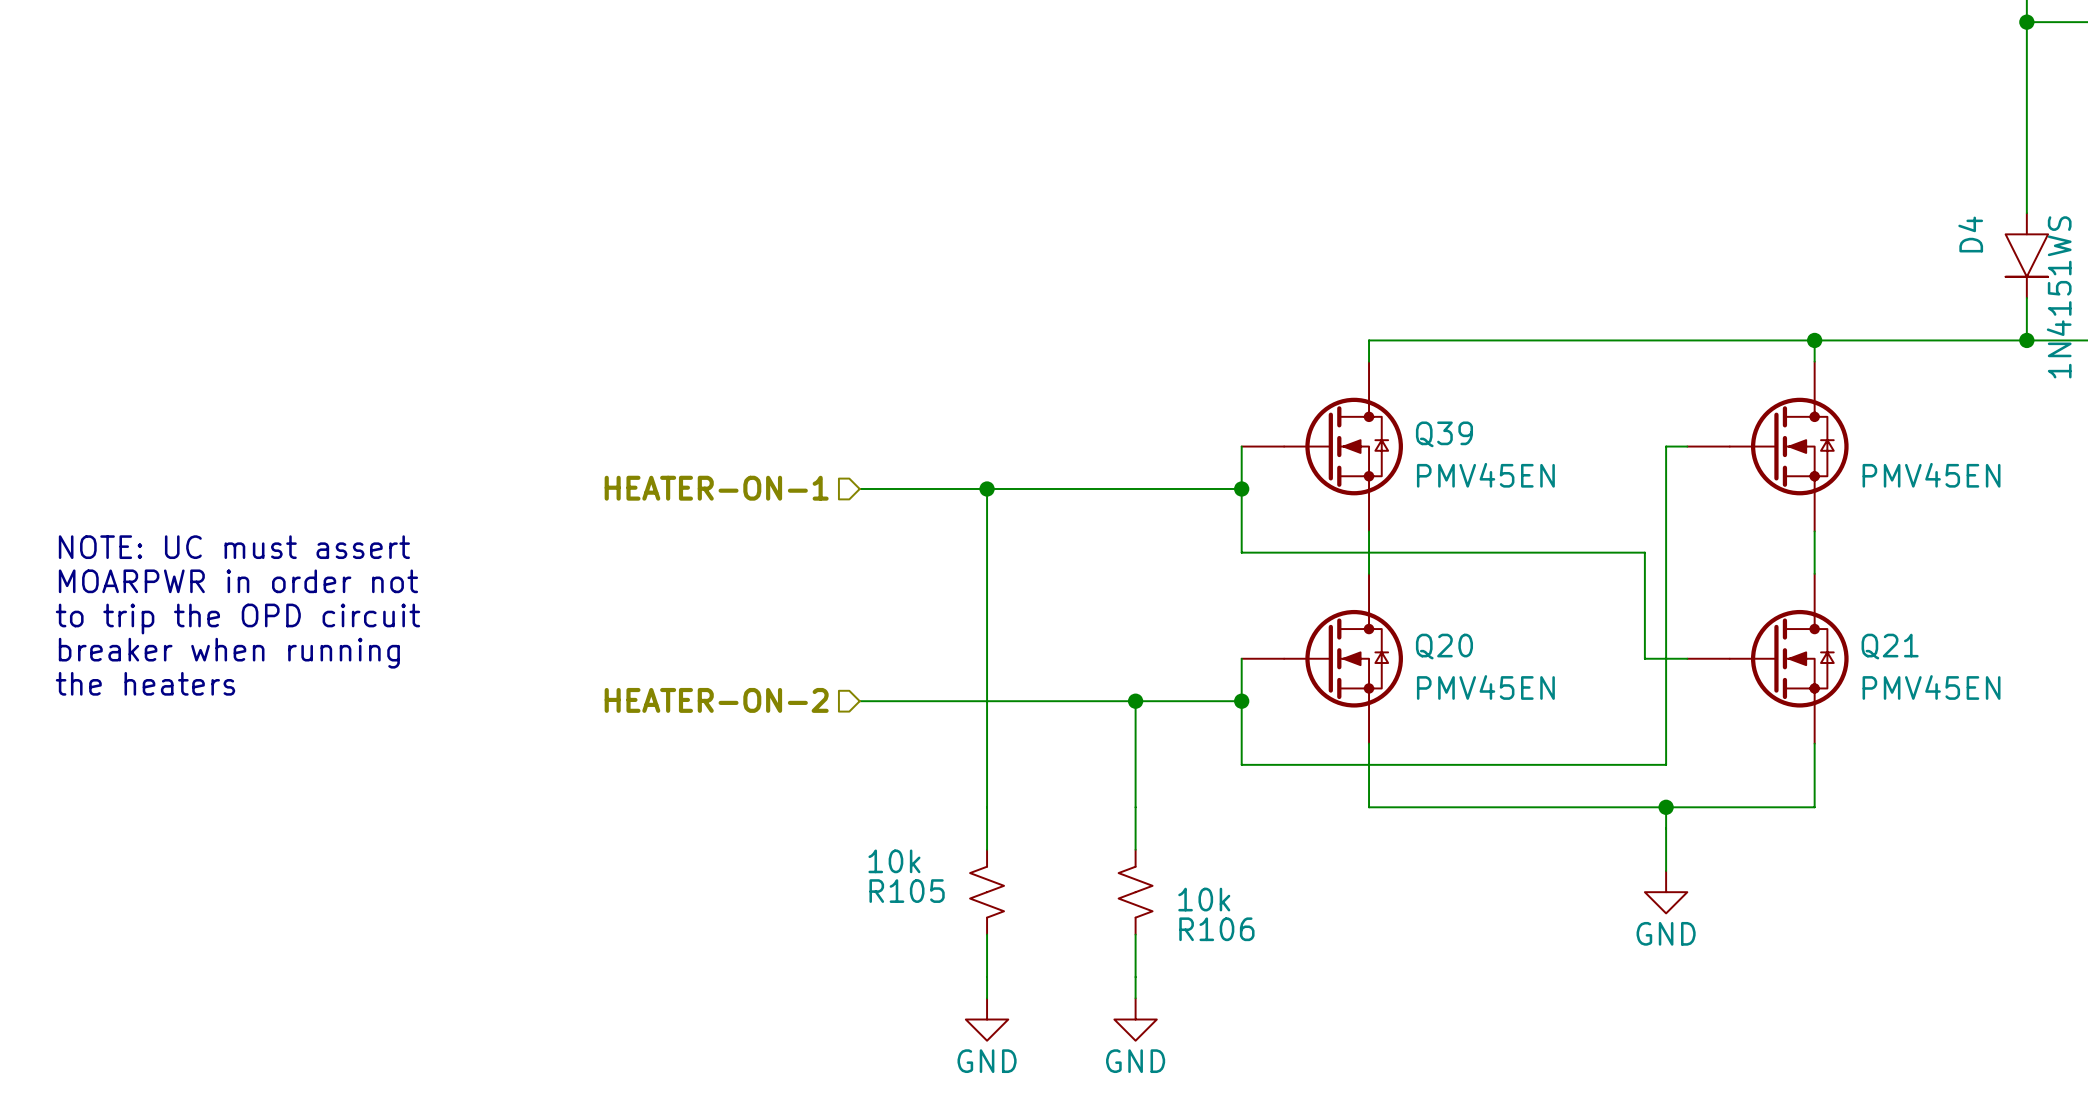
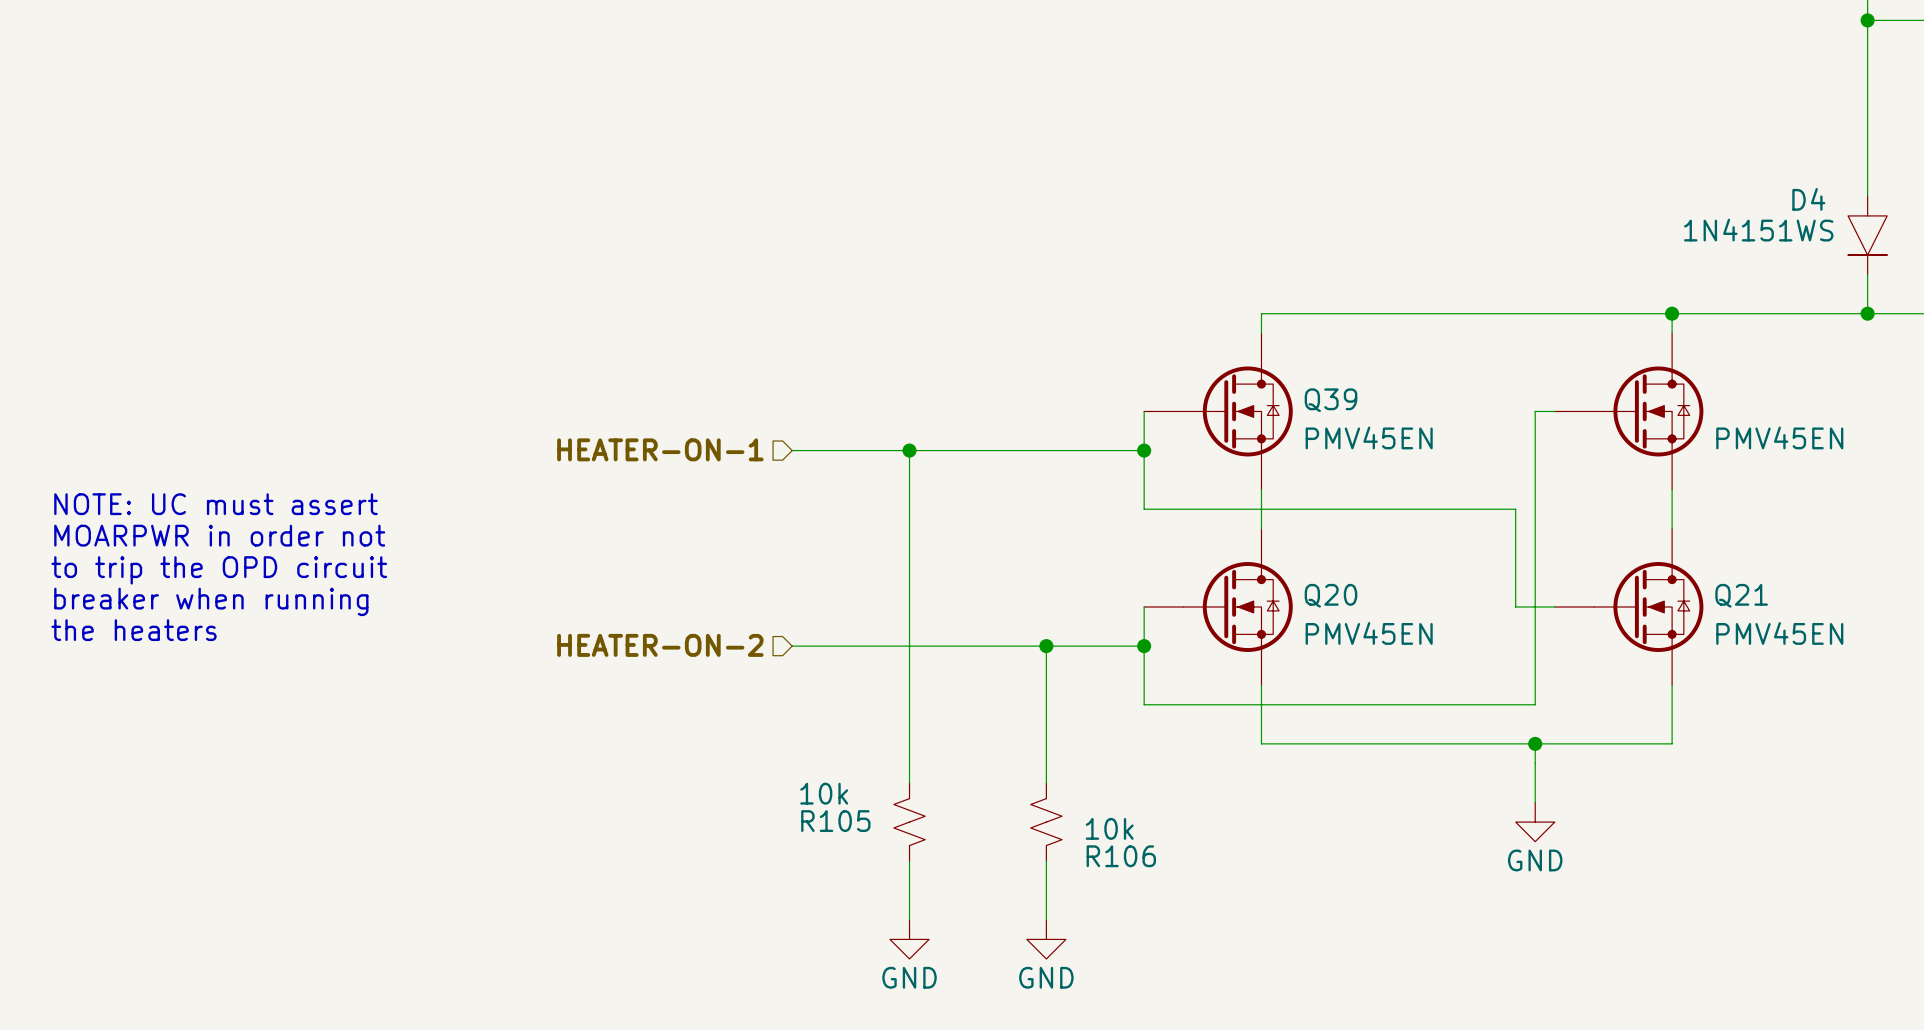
D4 name rotation: 0° (1970, 234) -> 90° clockwise (1808, 199)
D4 value rotation: 0° (2059, 297) -> 90° clockwise (1758, 230)

